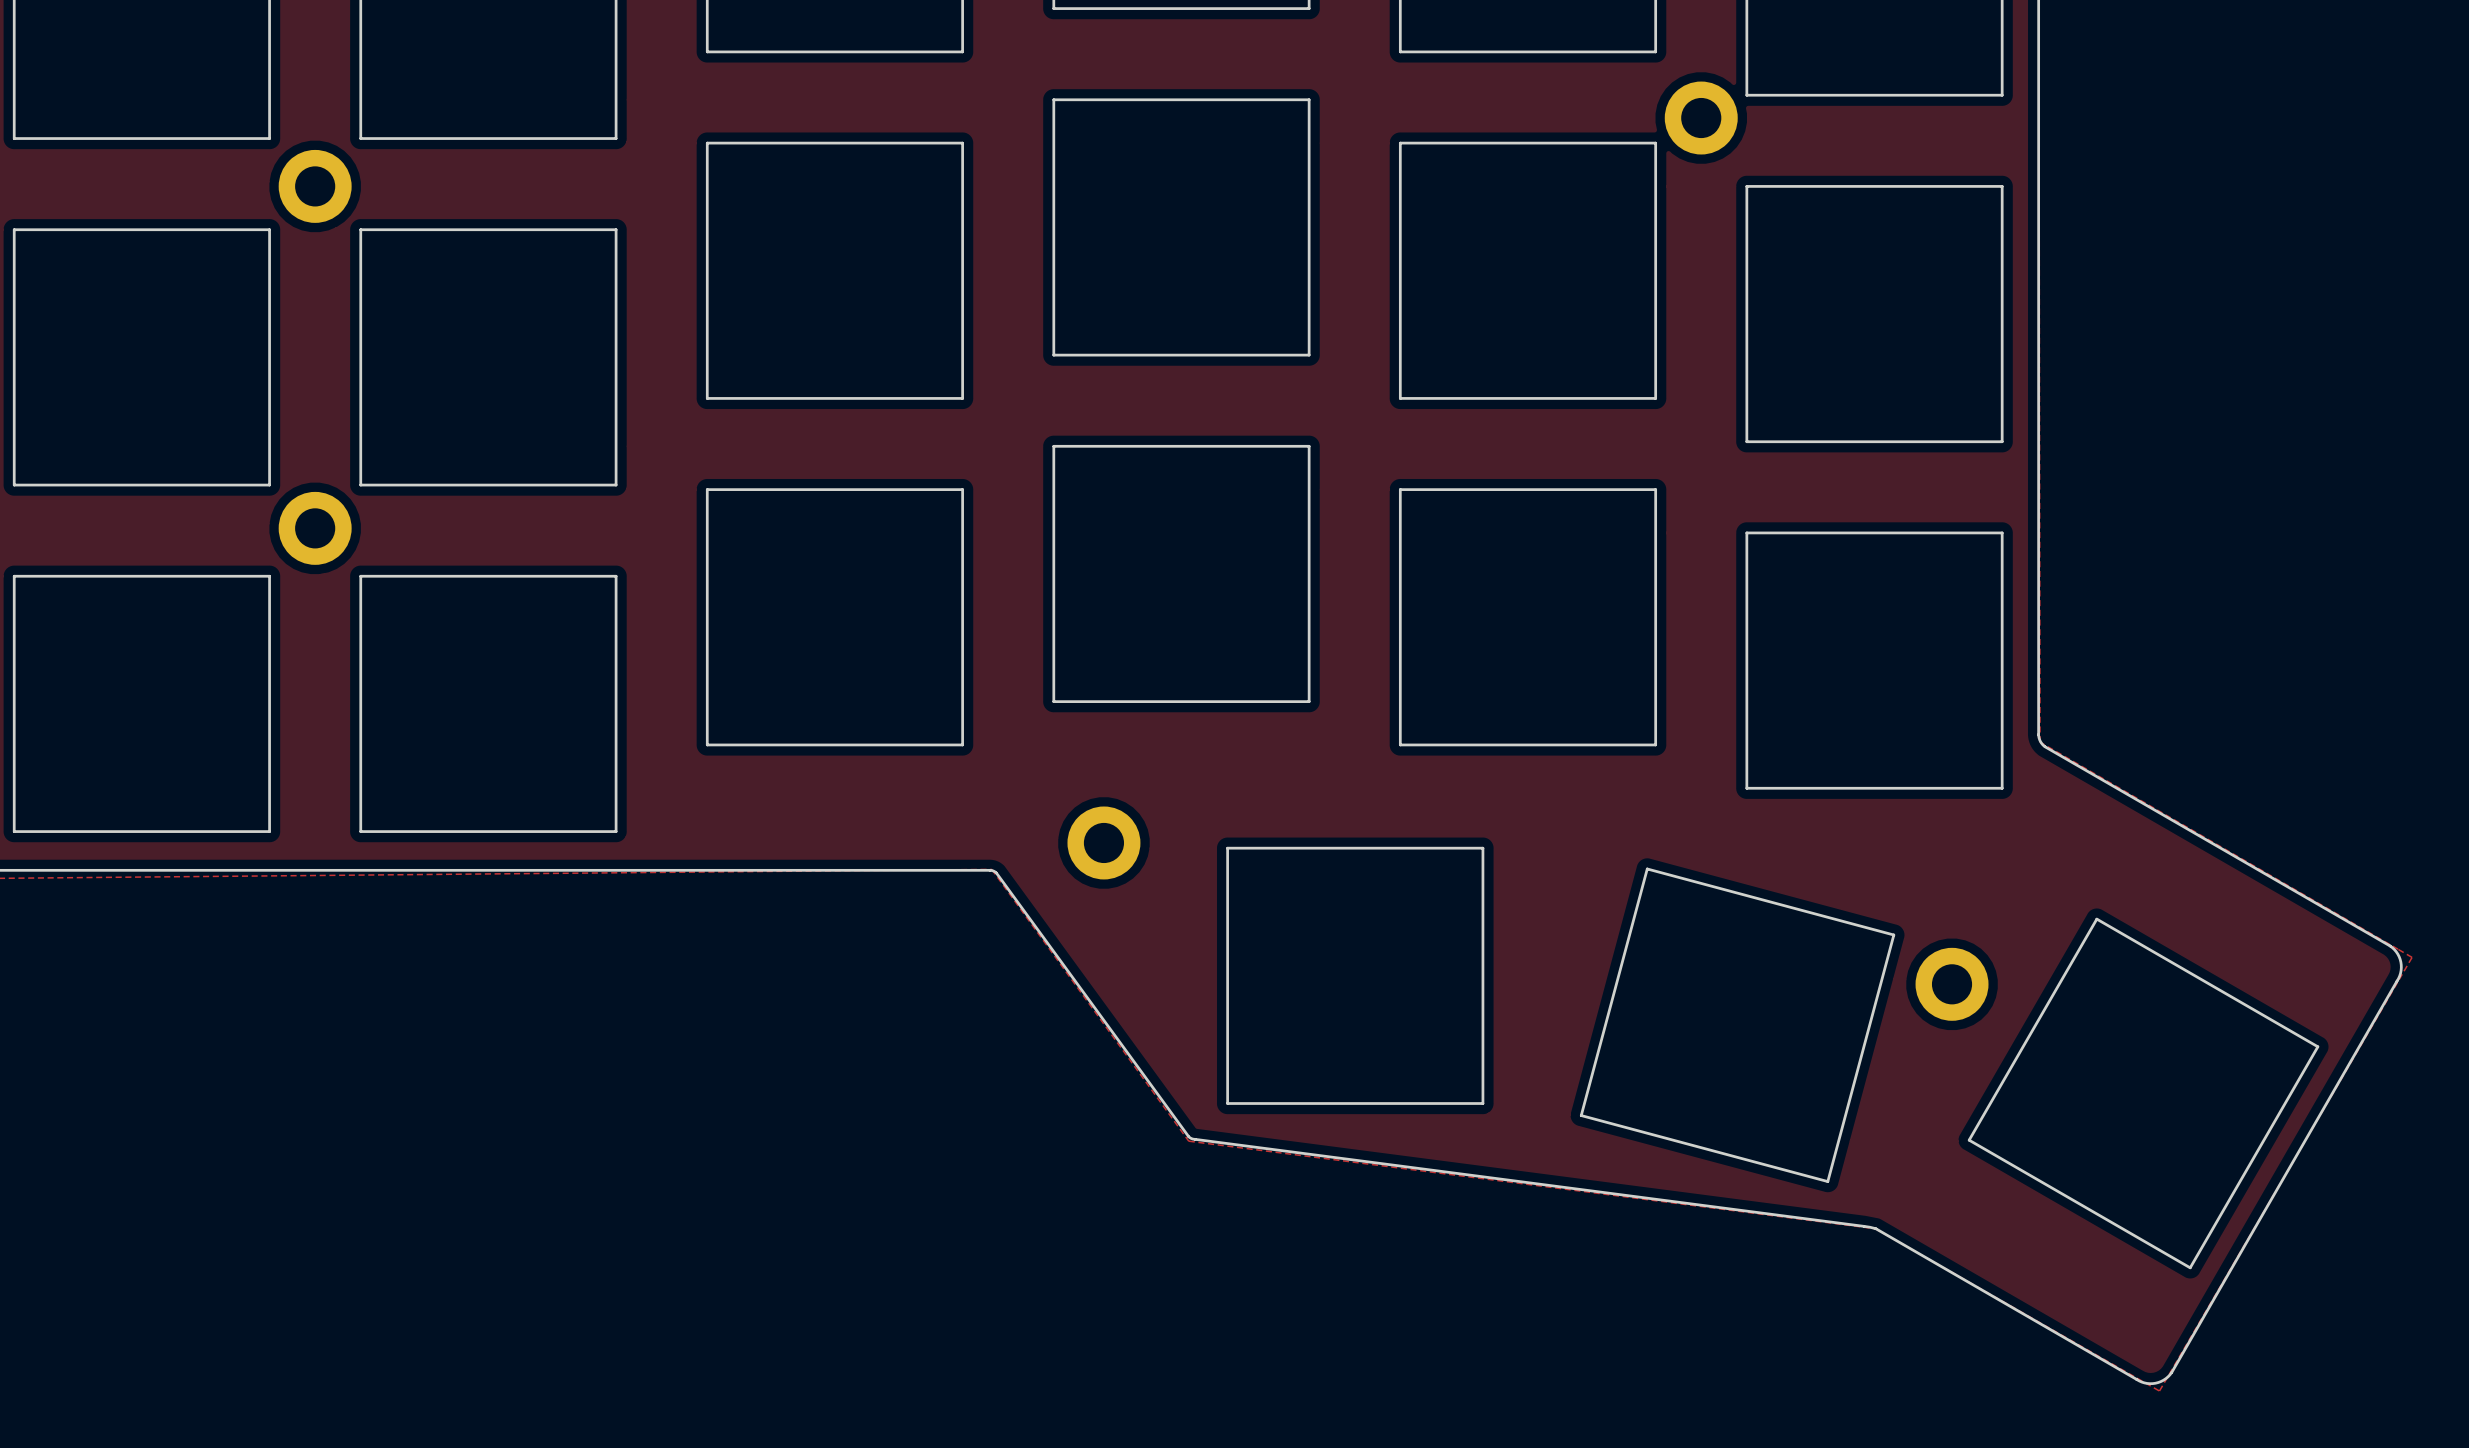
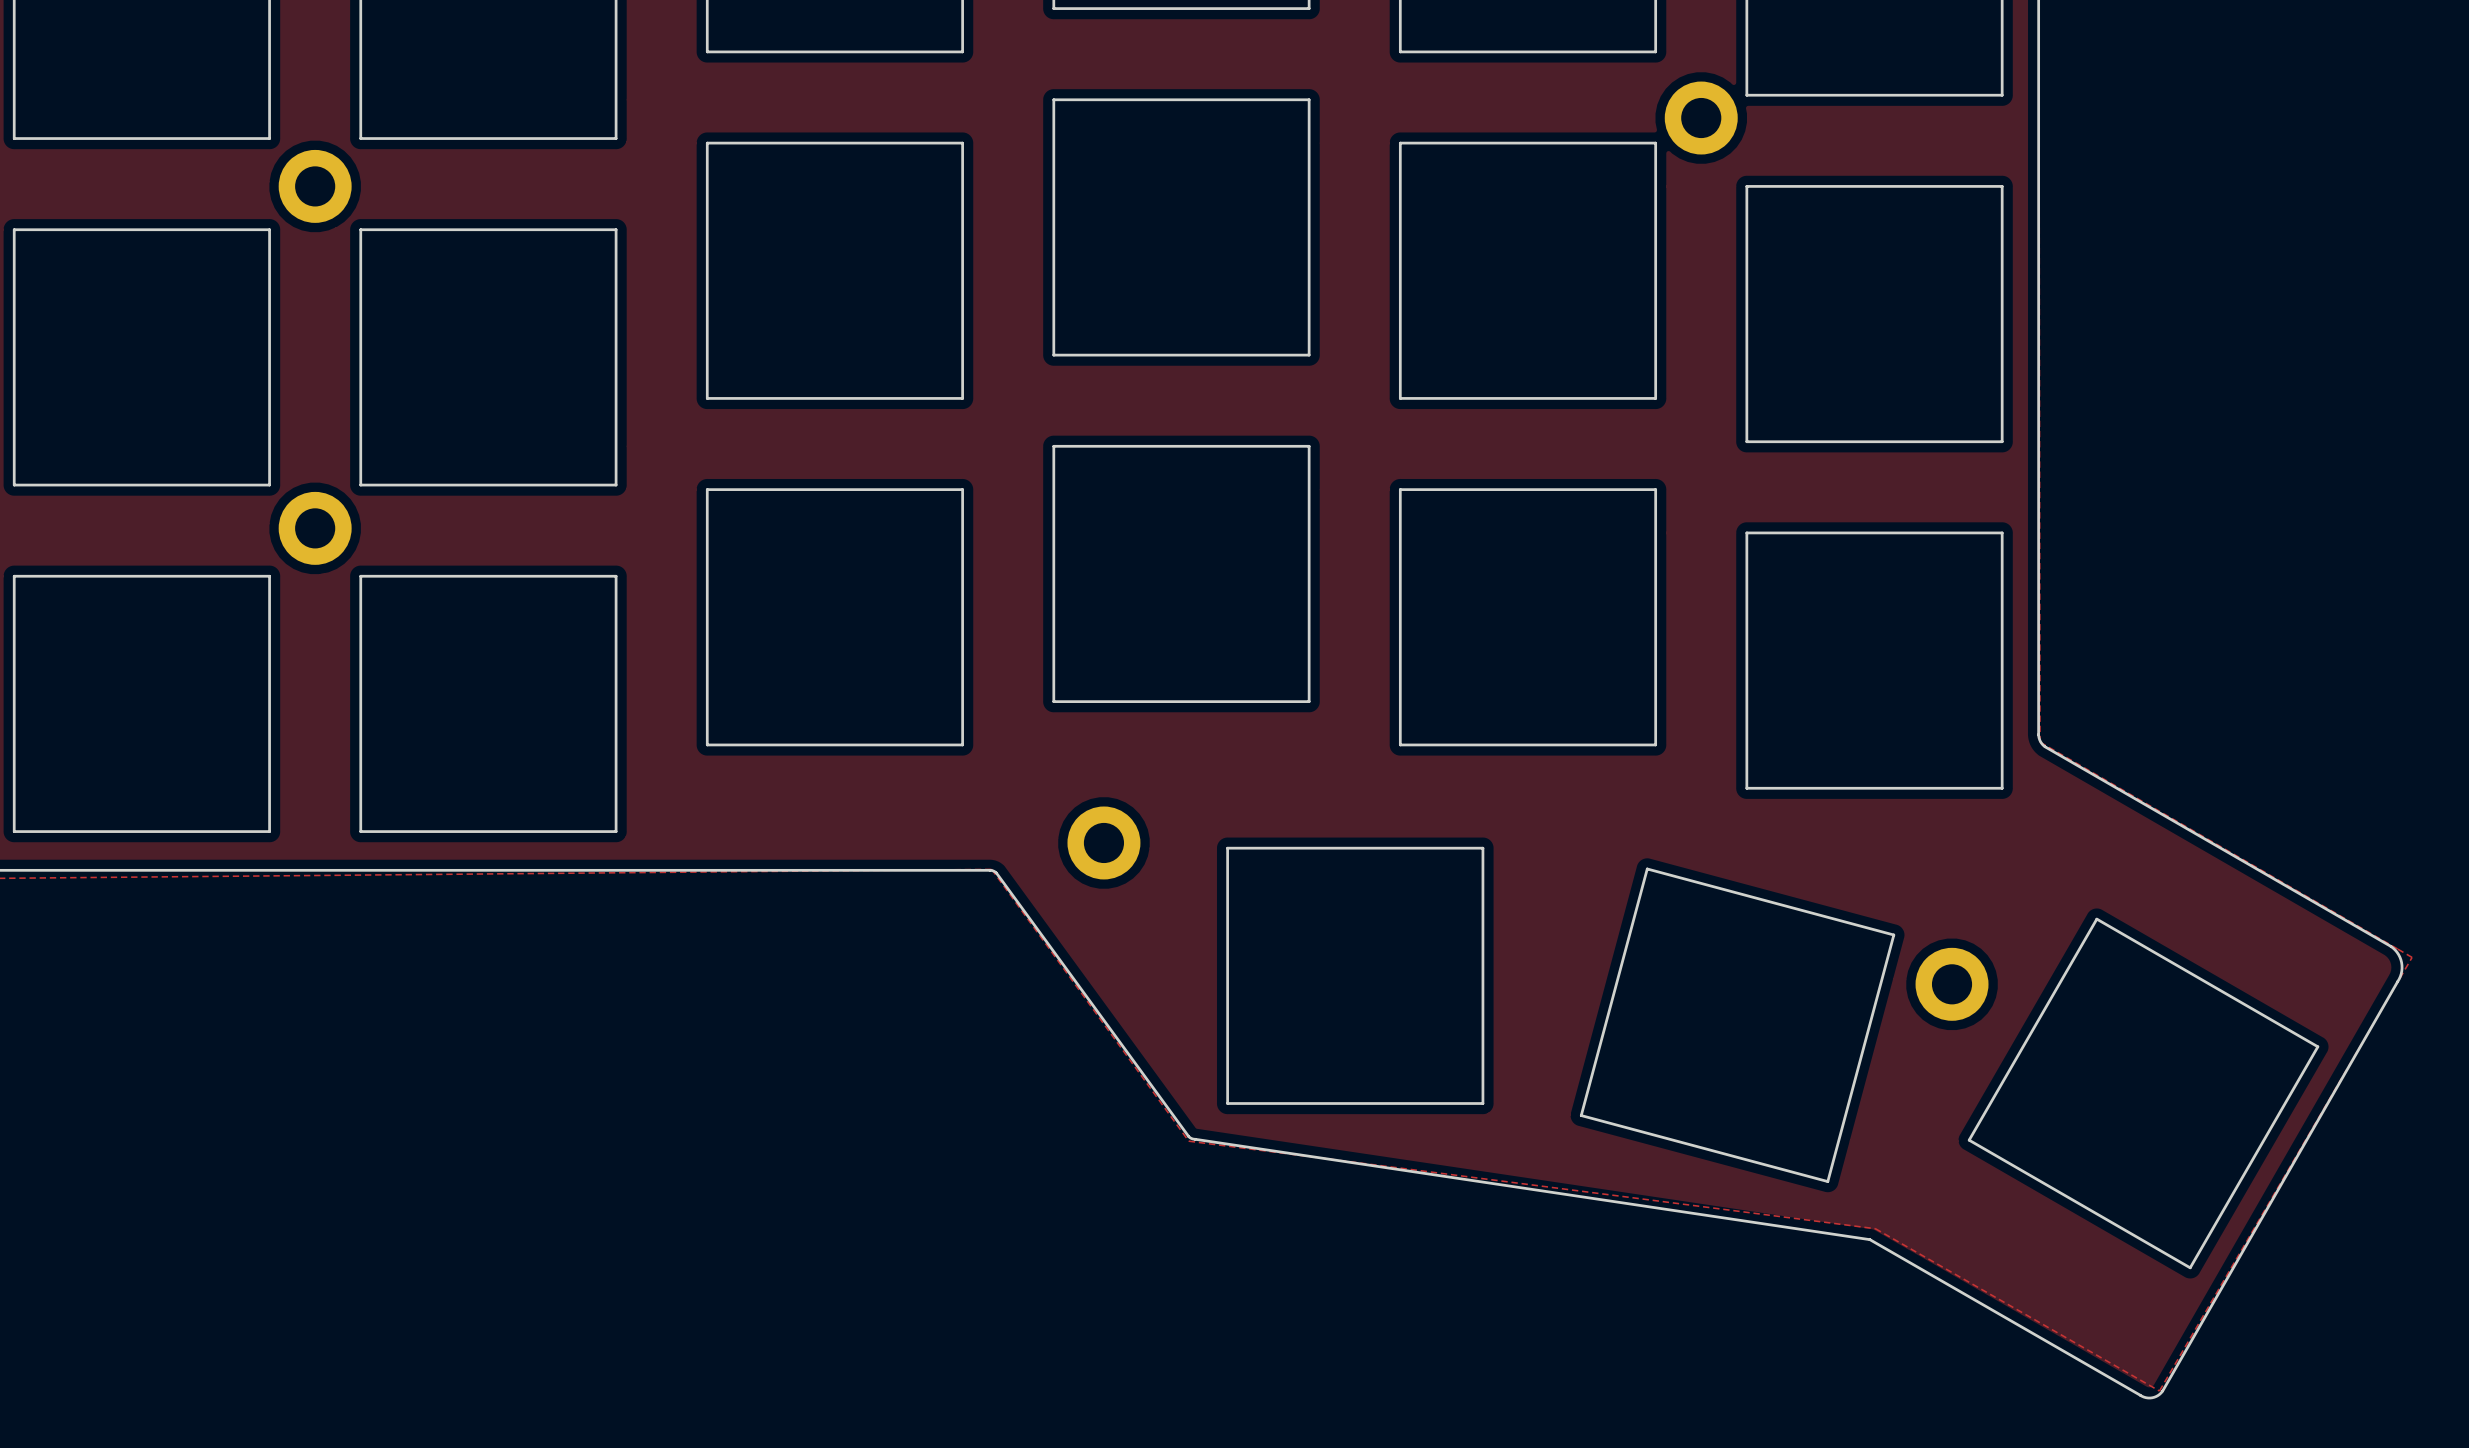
board edge: (2045, 746) (2390, 945) (2397, 954) (2400, 962) (2398, 978) (2171, 1372) (2163, 1380) (2155, 1383) (2139, 1380) (1875, 1228) (1191, 1138) (996, 873) -> (2045, 746) (2390, 946) (2398, 954) (2401, 962) (2399, 979) (2162, 1391) (2152, 1397) (2142, 1396) (1869, 1239) (1191, 1138) (996, 873)

